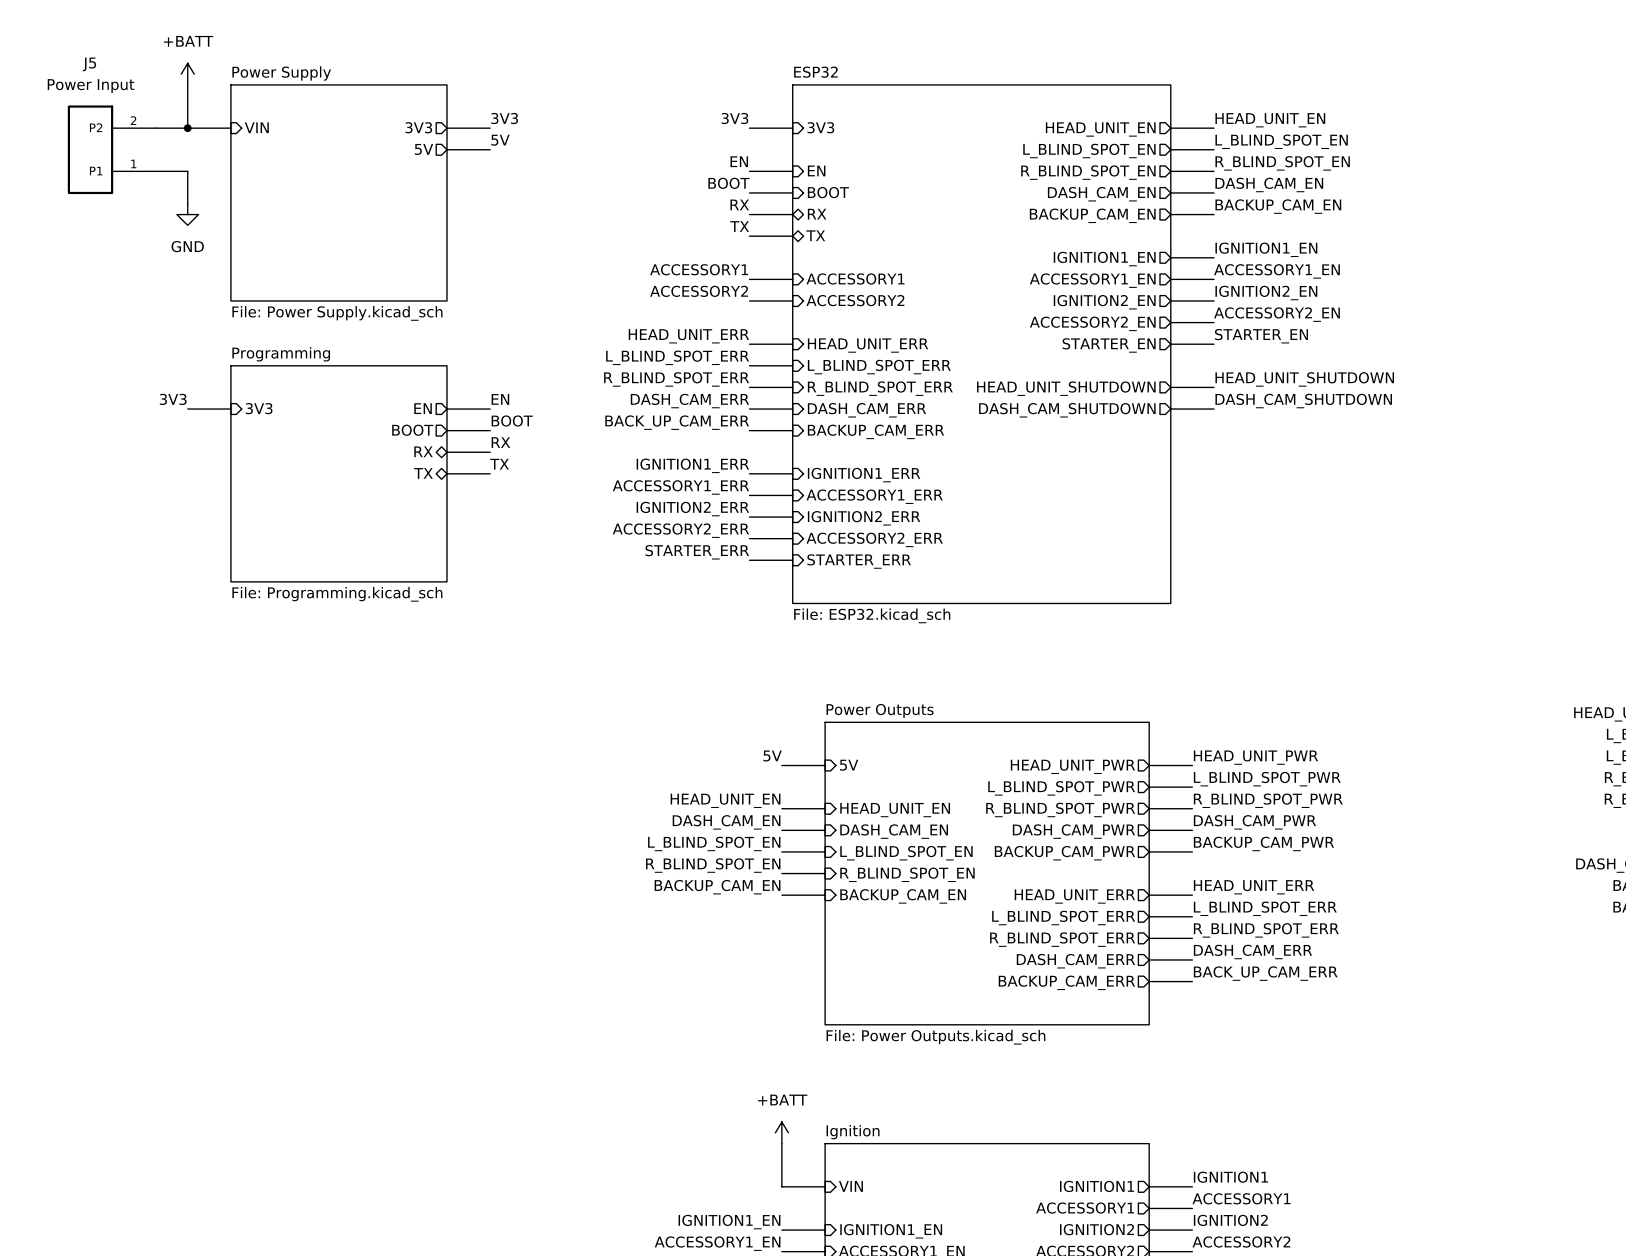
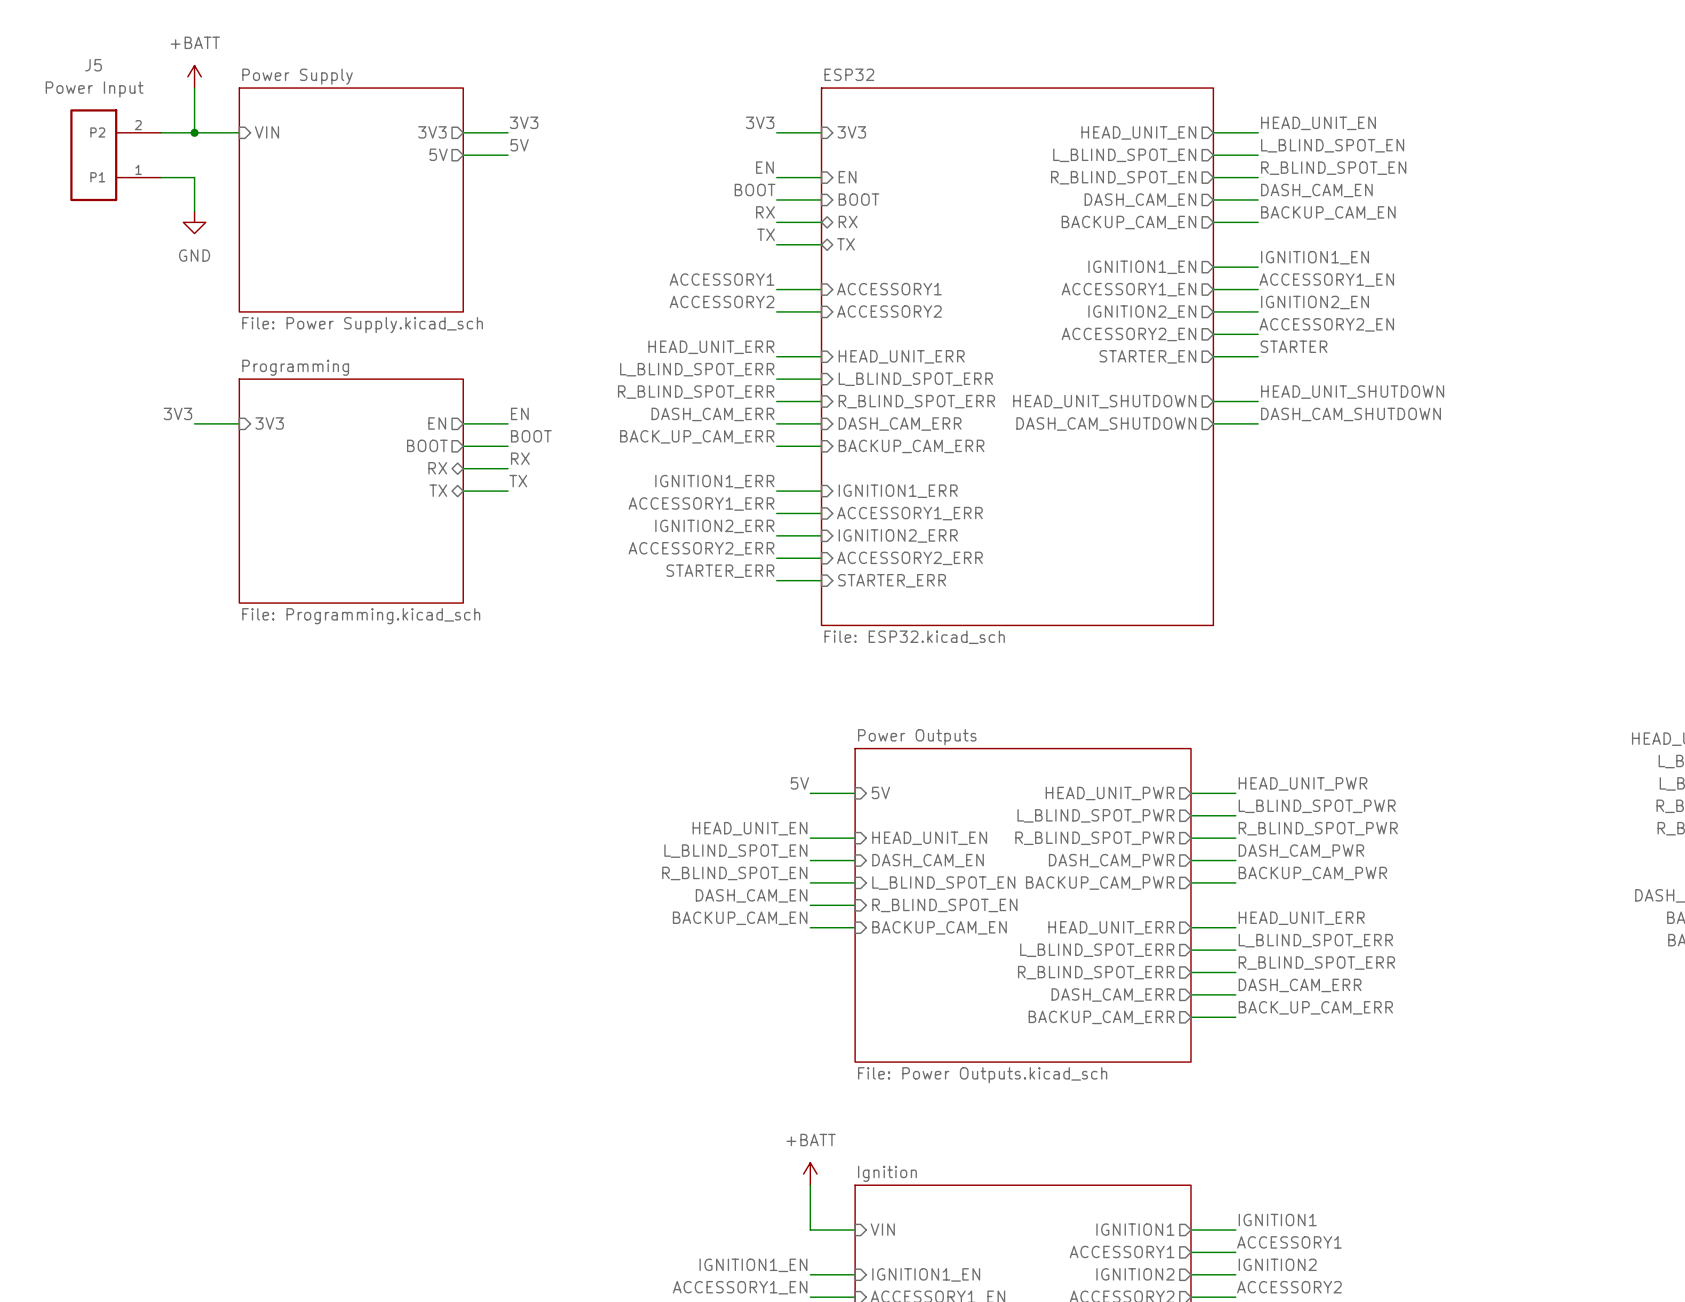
label: STARTER_EN (1261, 336) -> STARTER (1293, 346)
label: DASH_CAM_EN (726, 822) -> L_BLIND_SPOT_EN (735, 851)
label: L_BLIND_SPOT_EN (714, 843) -> R_BLIND_SPOT_EN (734, 873)
label: R_BLIND_SPOT_EN (713, 865) -> DASH_CAM_EN (751, 895)

